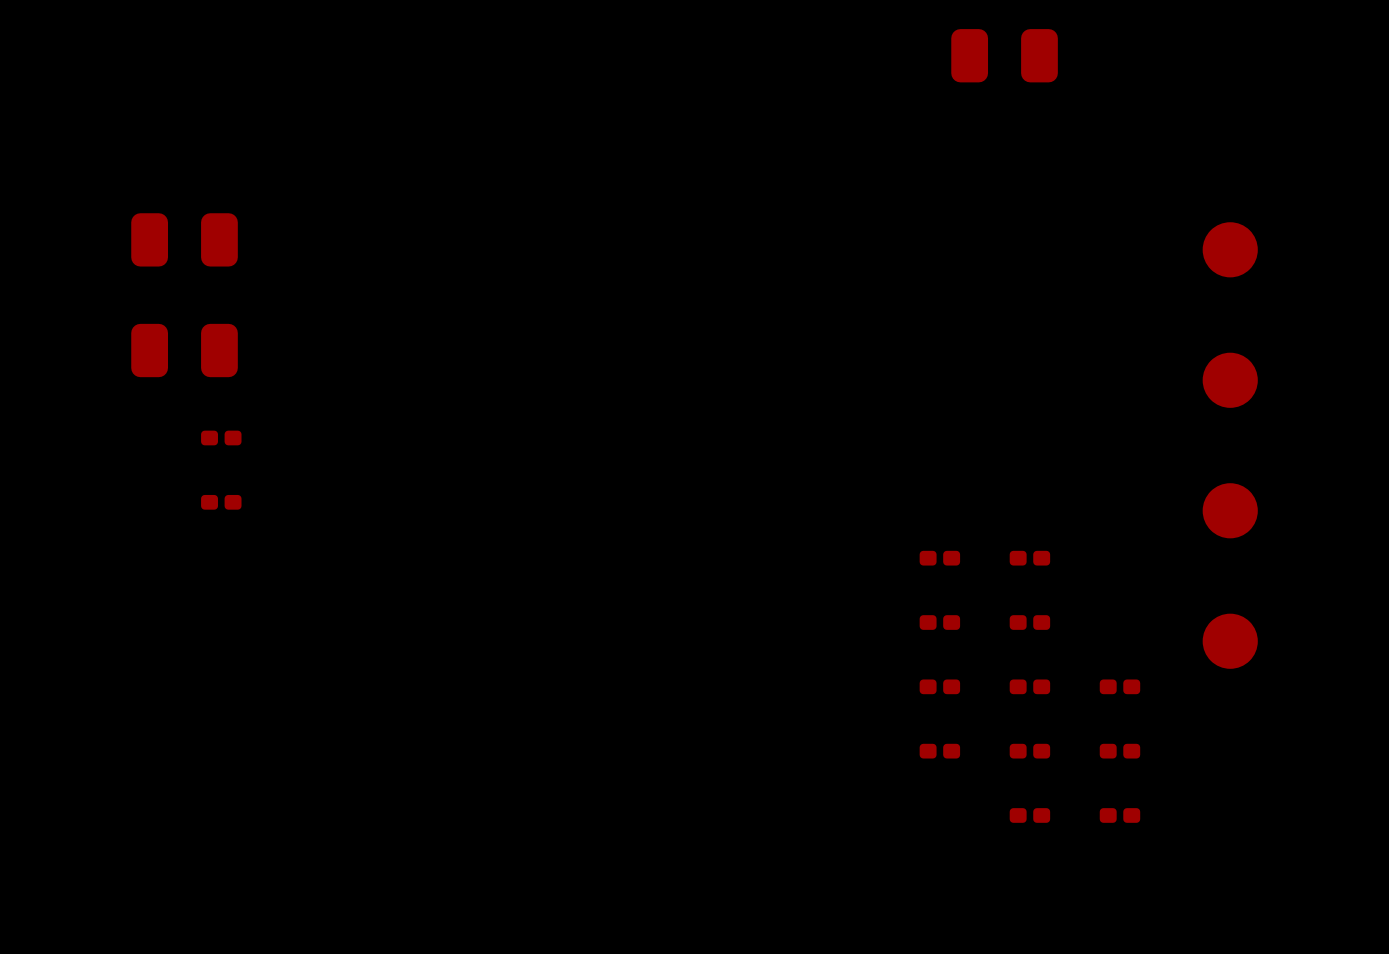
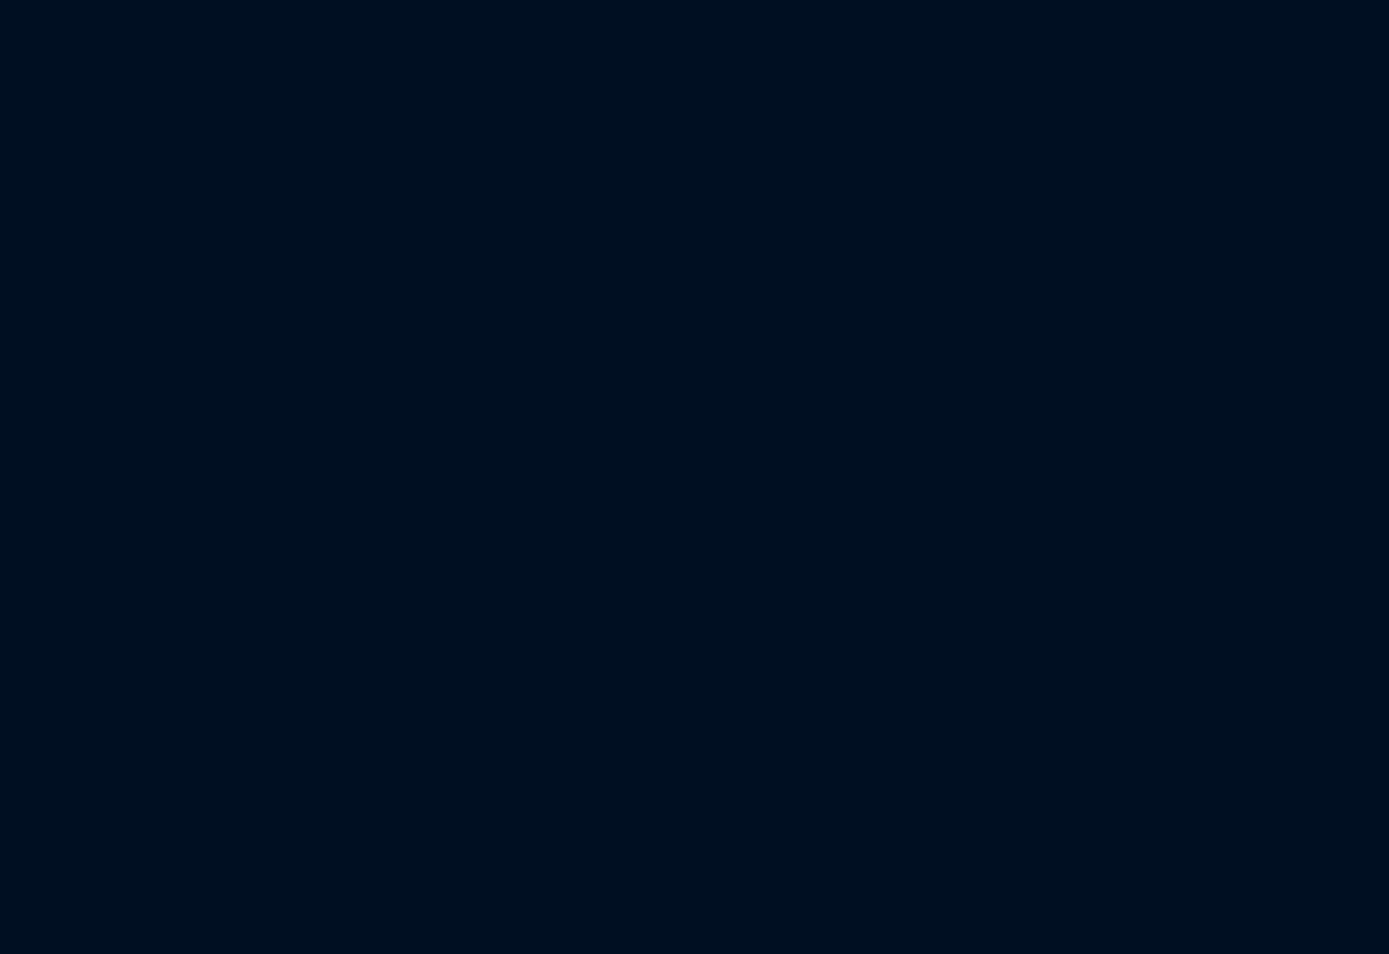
part: (1004, 55) -> none
part: (184, 239) -> none
part: (1230, 249) -> none
part: (184, 350) -> none
part: (1230, 380) -> none
part: (221, 437) -> none
part: (221, 502) -> none
part: (1230, 510) -> none
part: (939, 558) -> none
part: (1029, 558) -> none
part: (939, 622) -> none
part: (1029, 622) -> none
part: (1230, 641) -> none
part: (939, 686) -> none
part: (1029, 686) -> none
part: (1119, 686) -> none
part: (939, 751) -> none
part: (1029, 751) -> none
part: (1119, 751) -> none
part: (1029, 815) -> none
part: (1119, 815) -> none

